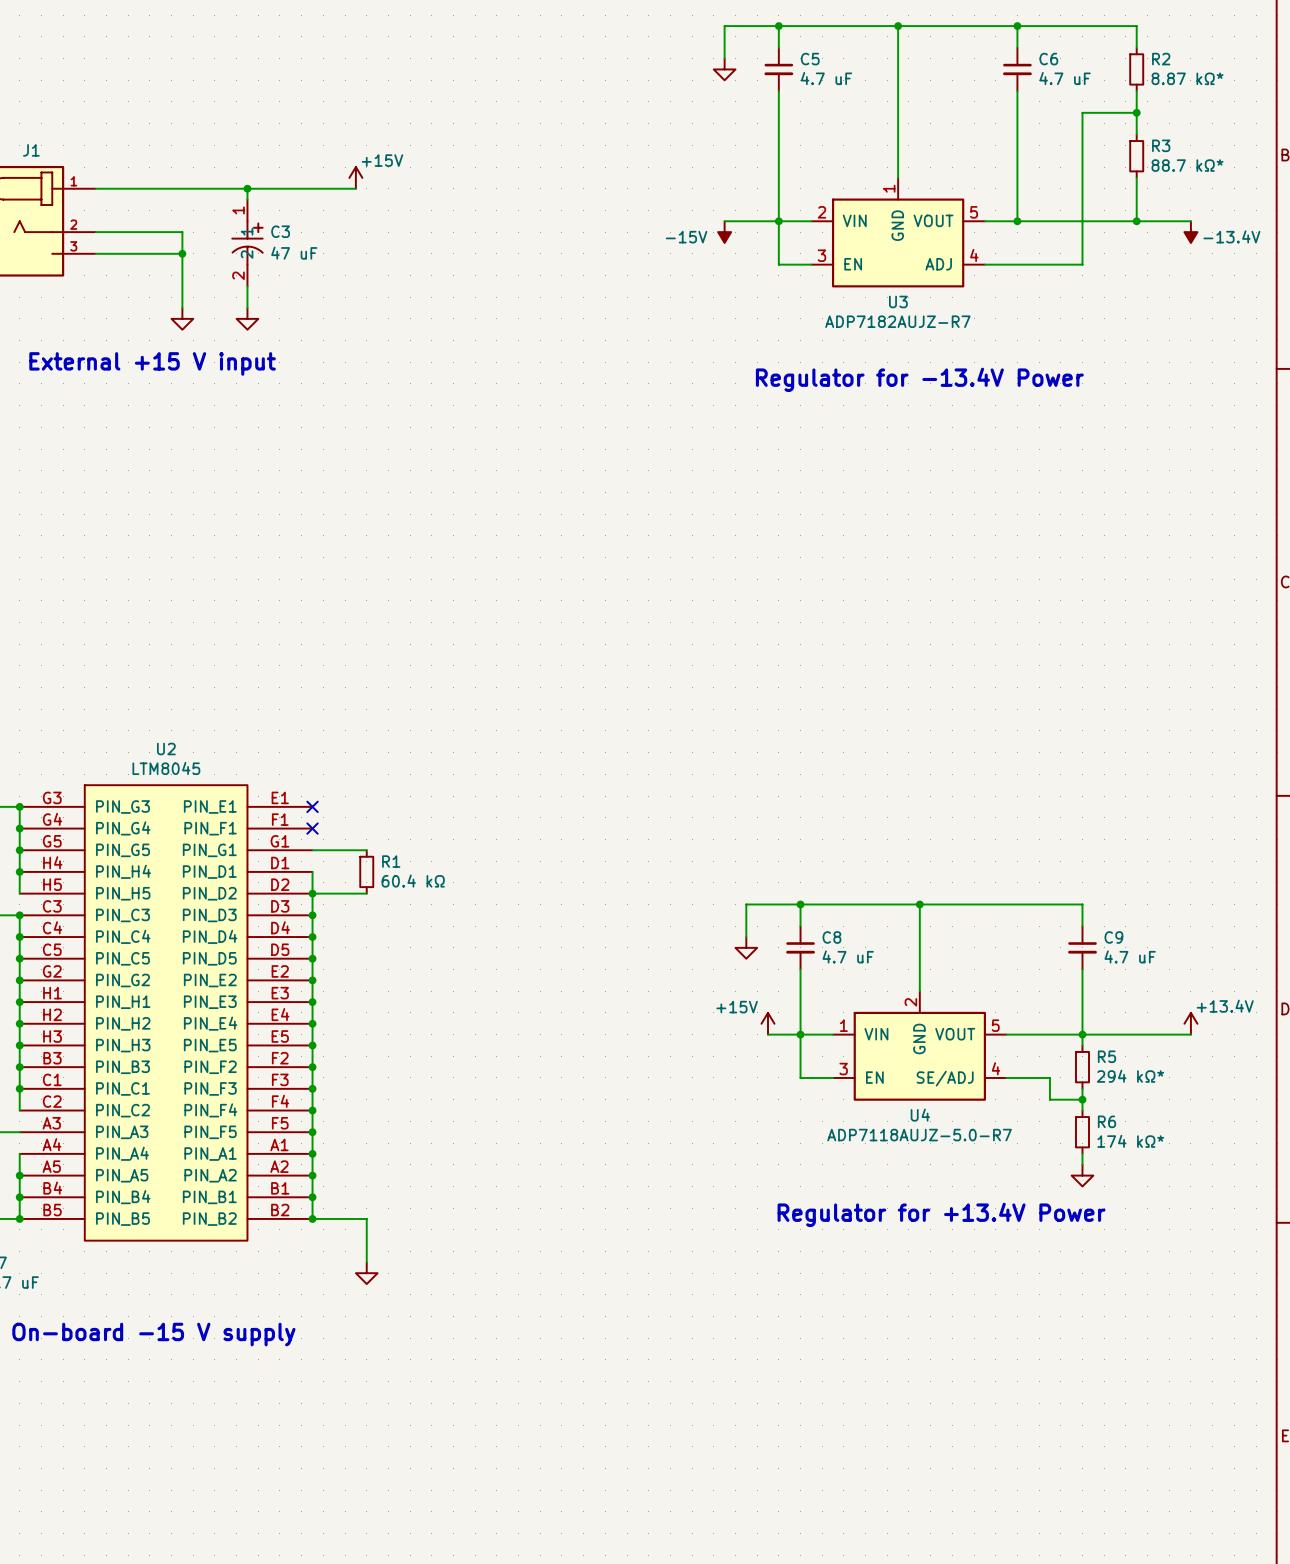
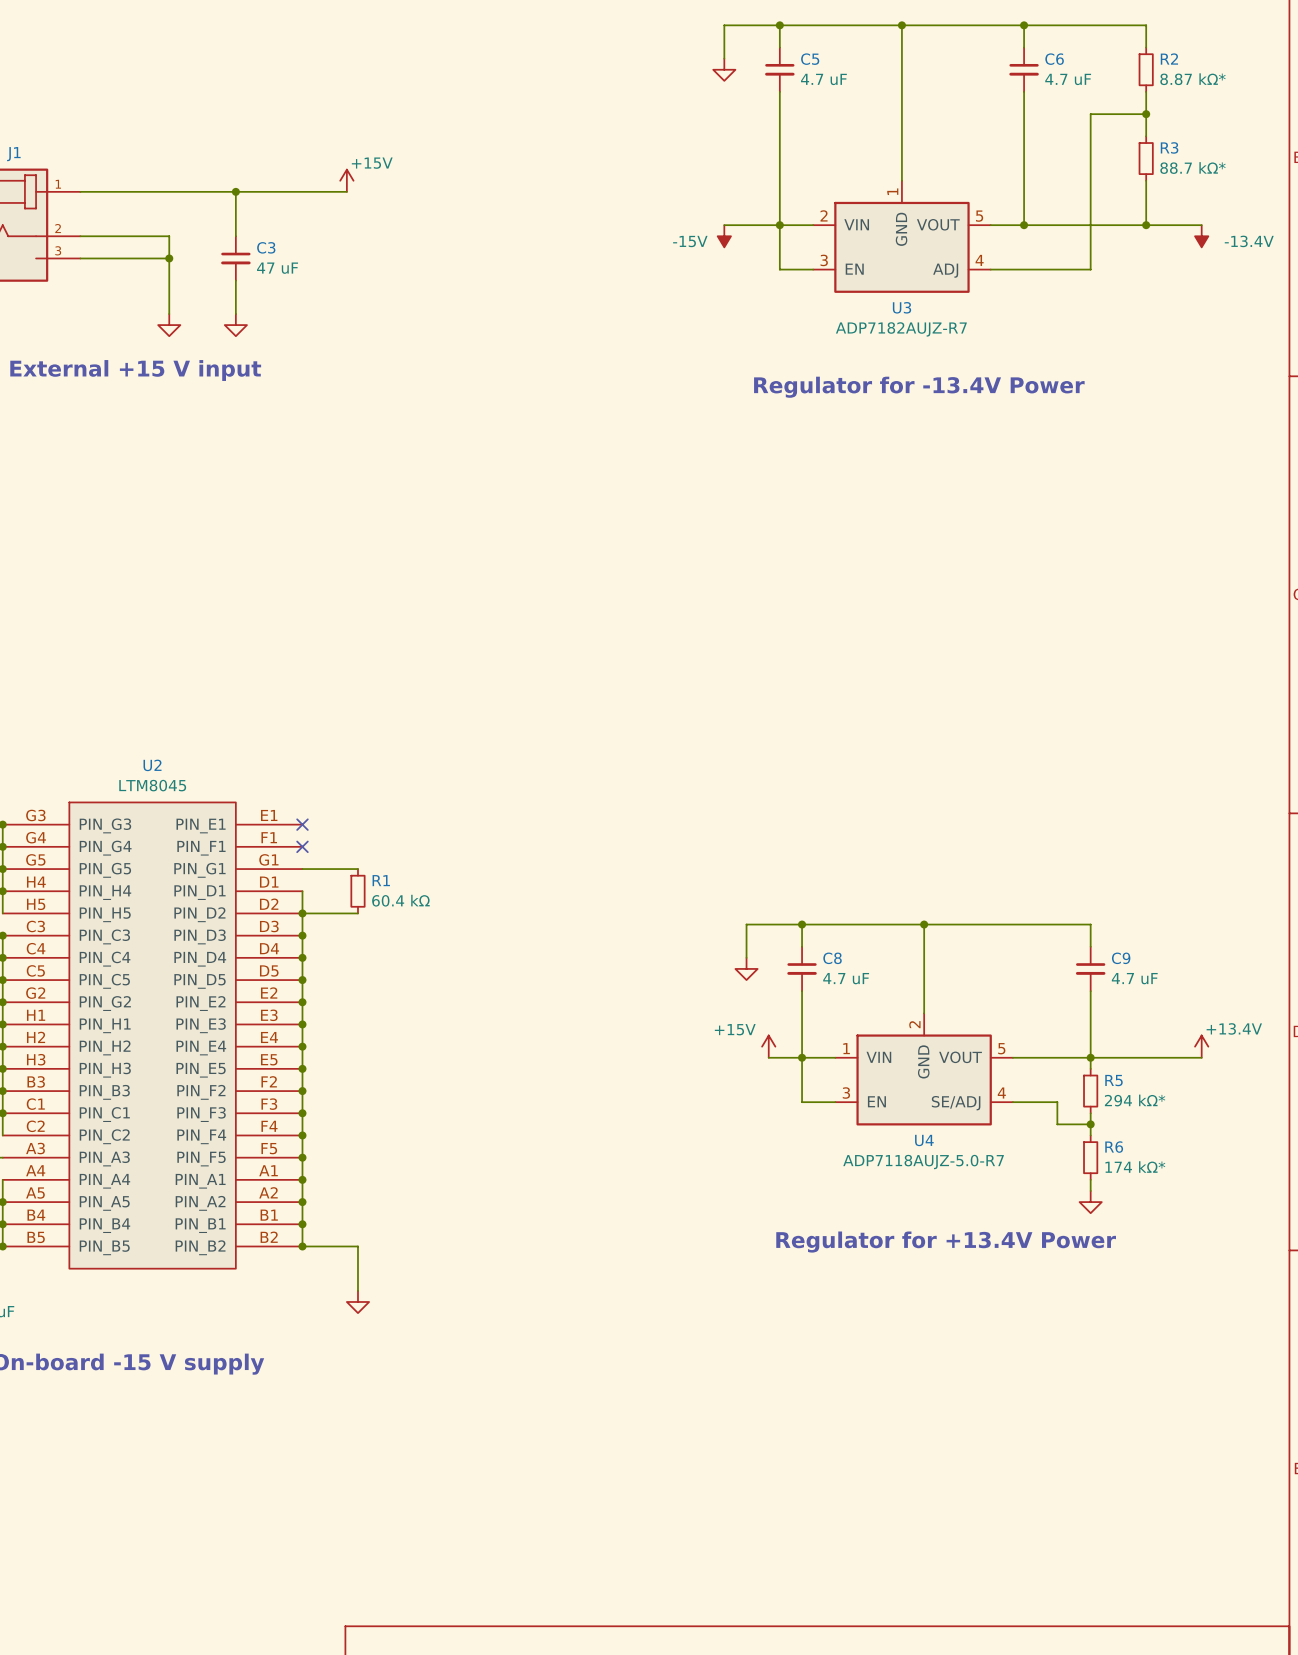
C3 symbol: [232, 199, 263, 287] -> [221, 236, 251, 281]

